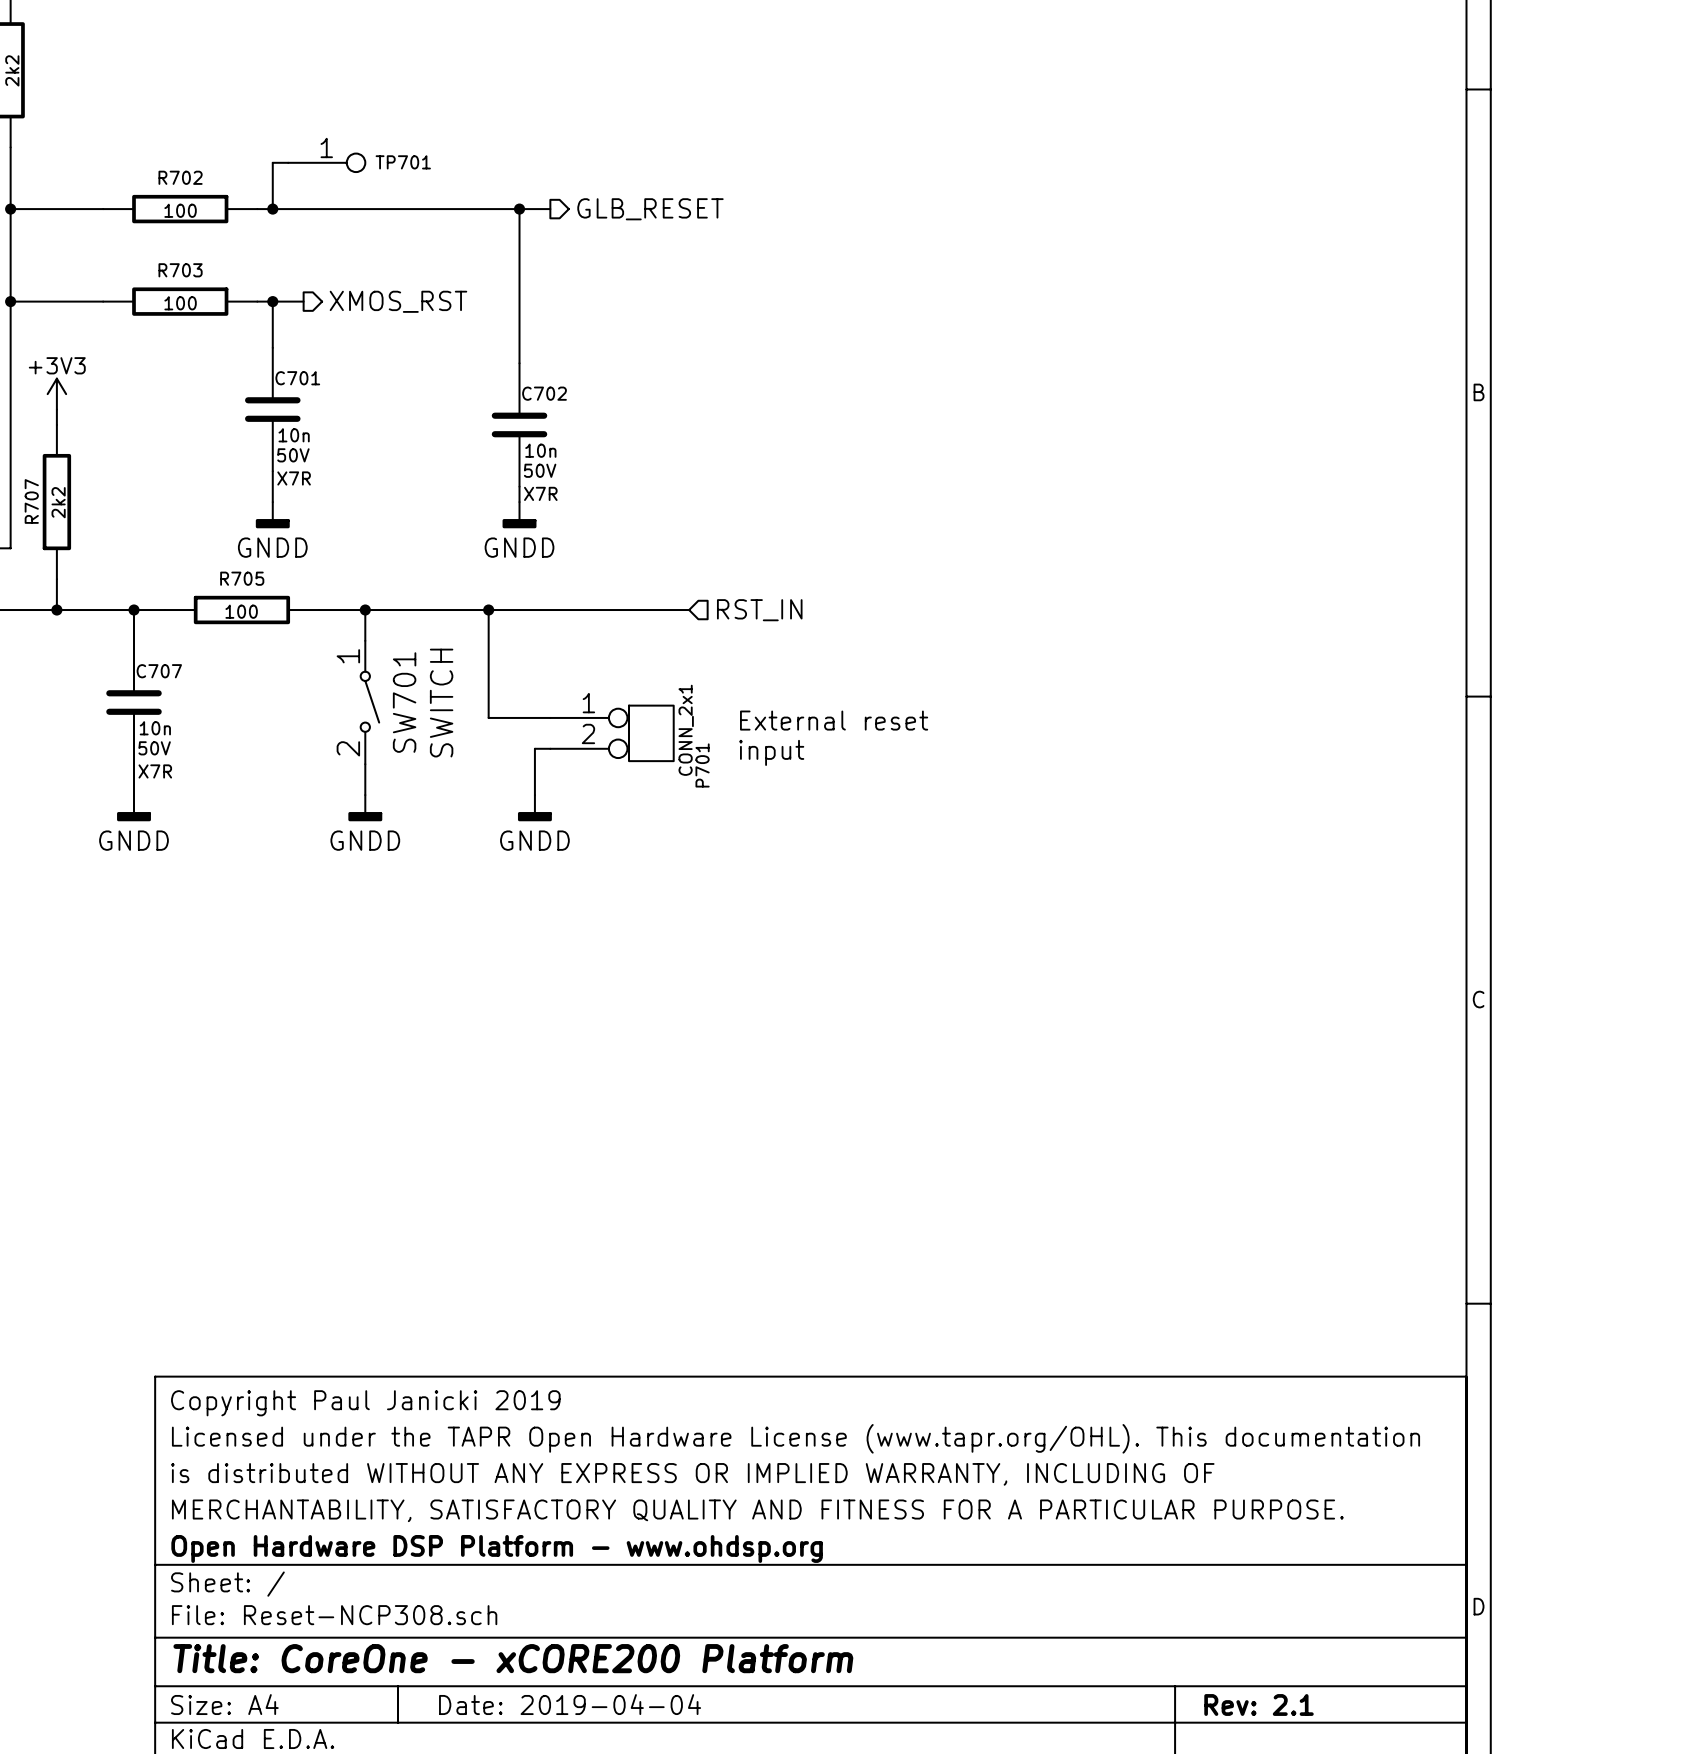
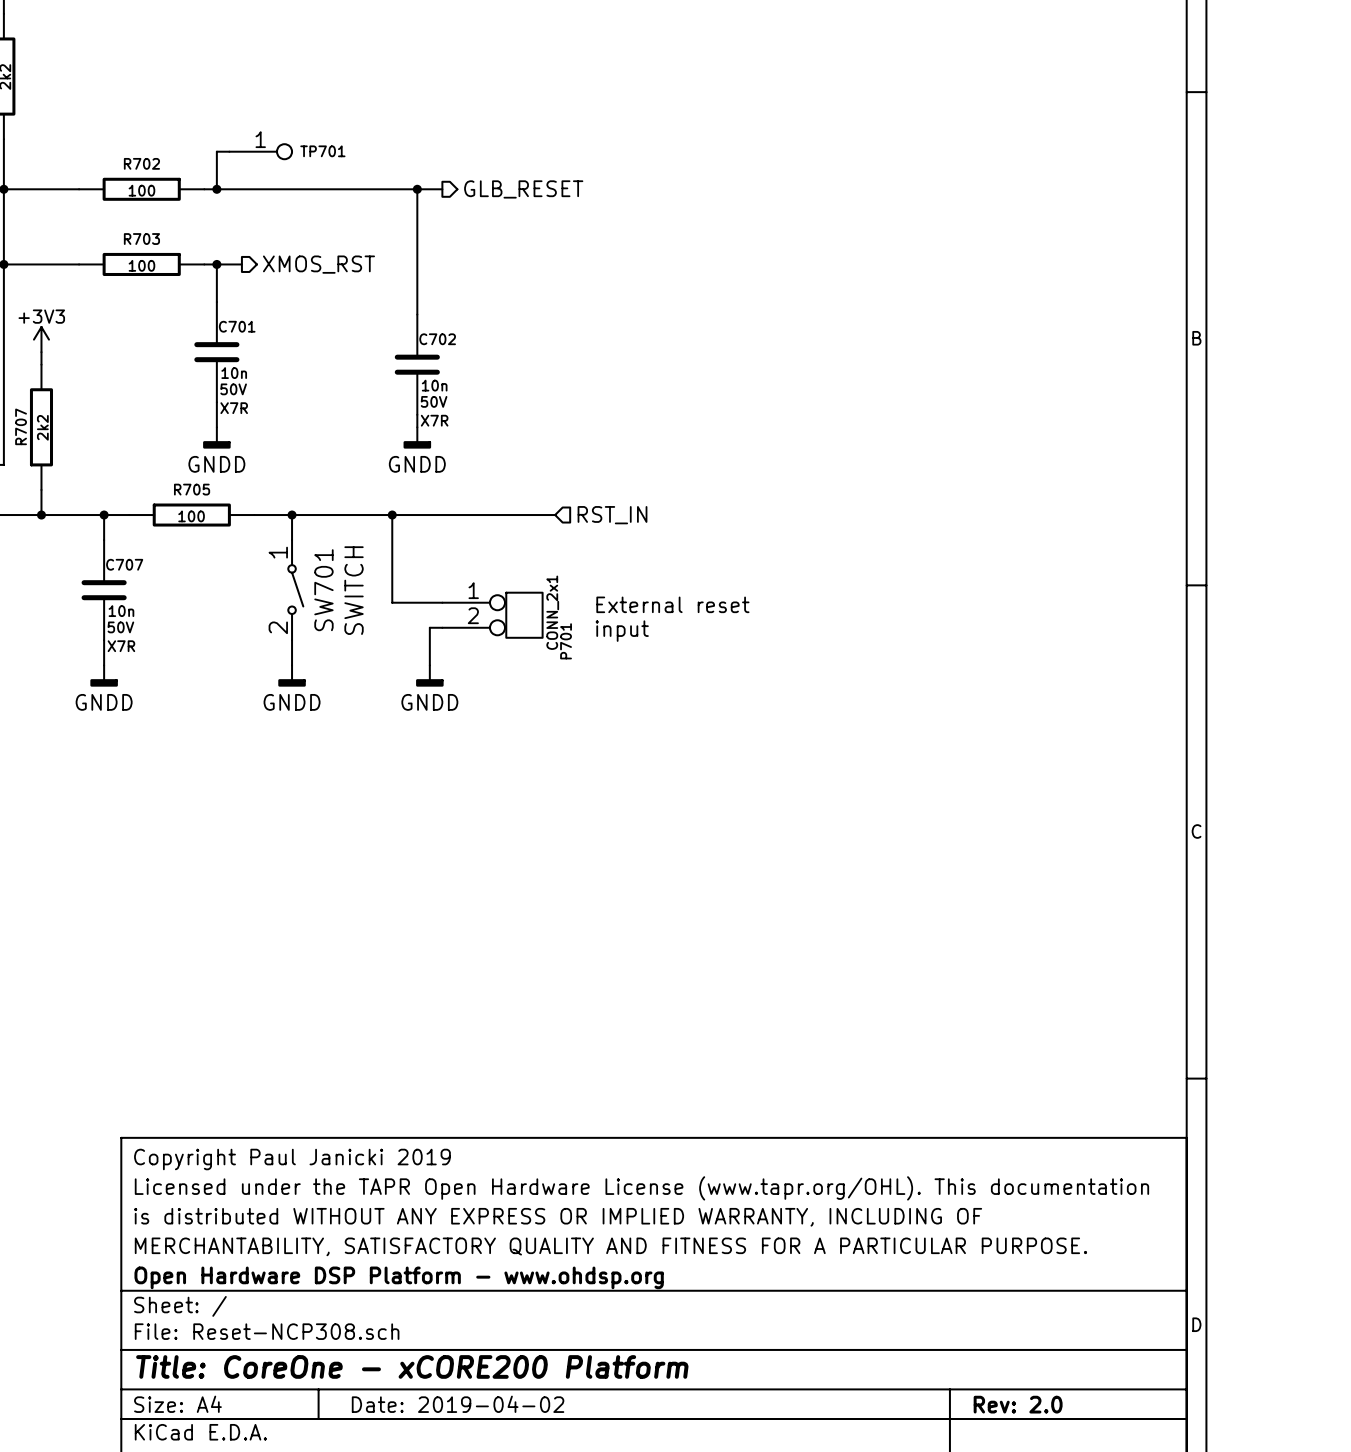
title block: Date: 2019-04-04 (570, 1704) -> Date: 2019-04-02 (458, 1404)
title block: Rev: 2.1 (1259, 1704) -> Rev: 2.0 (1018, 1404)

